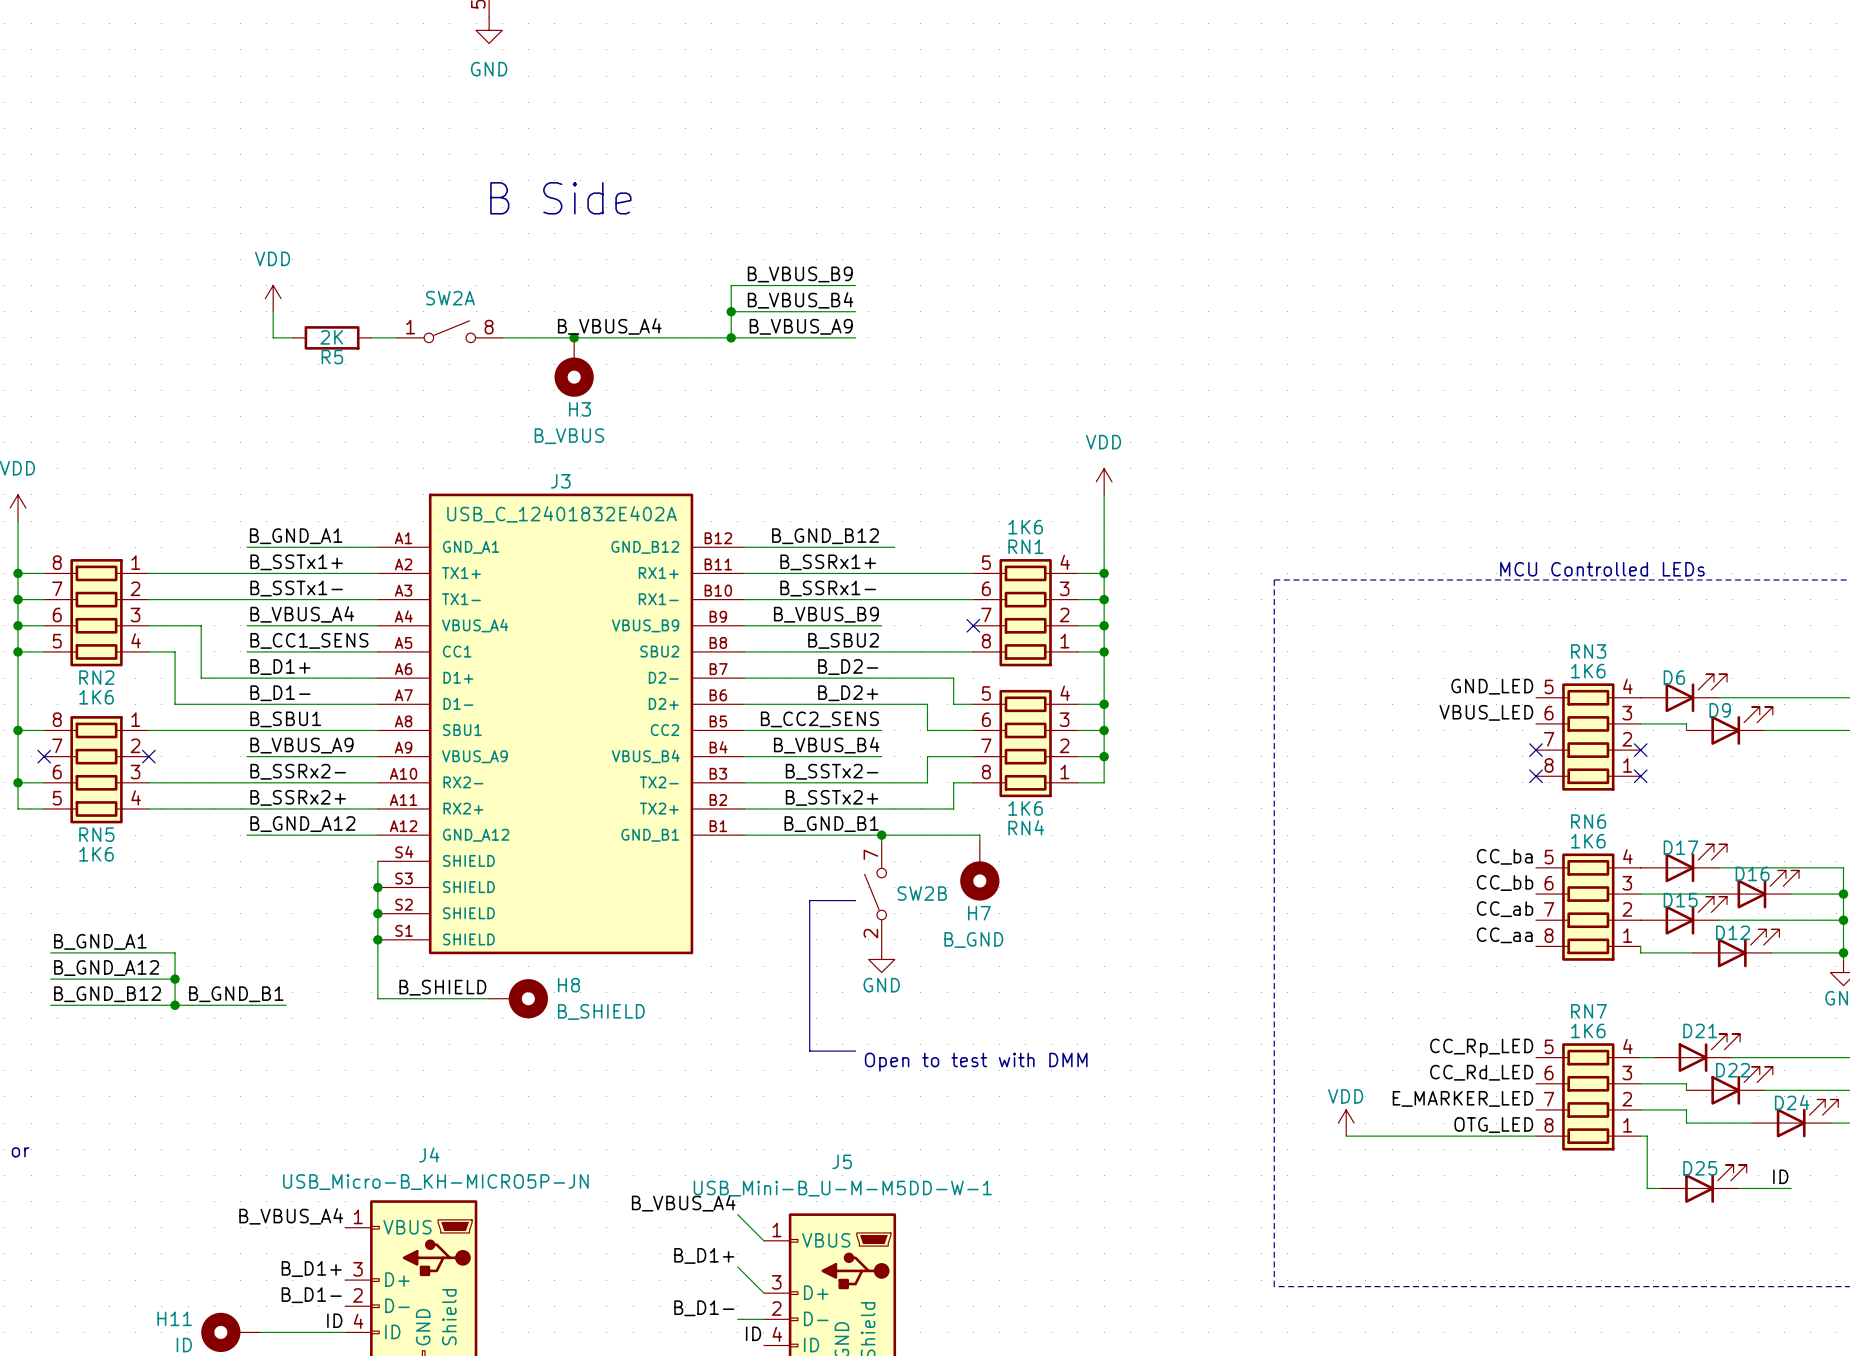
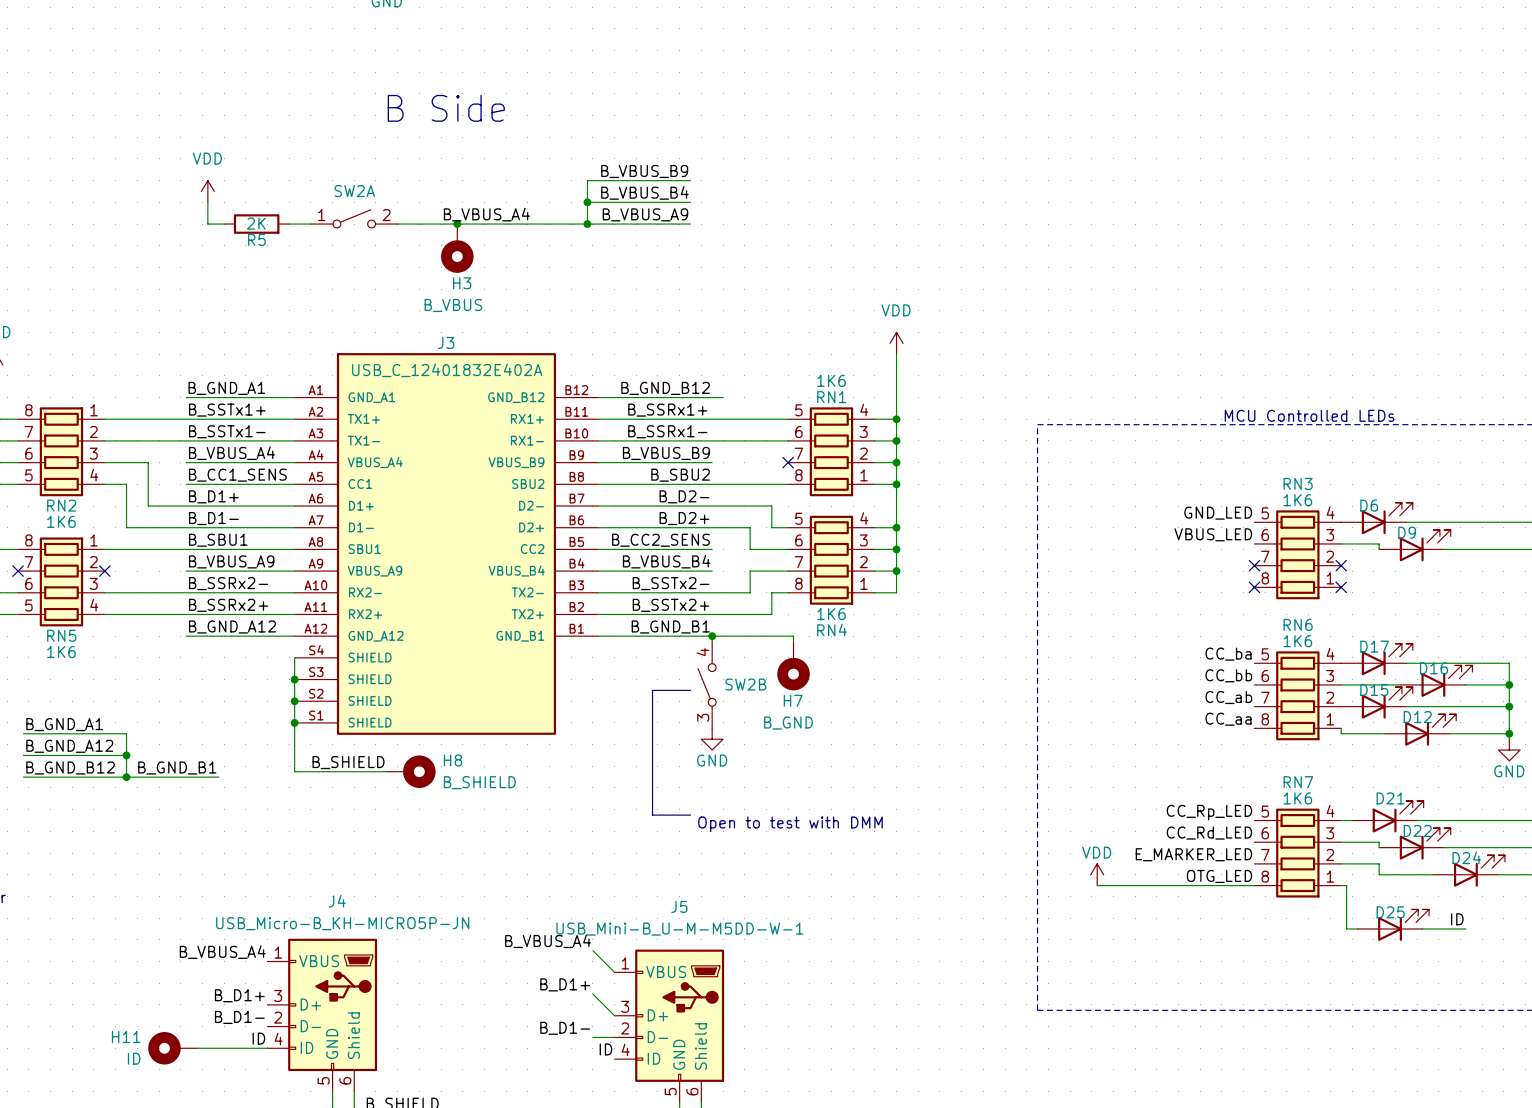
SW2A pin number: 8 (489, 327) -> 2 (386, 215)
SW2B pin number: 7 (870, 854) -> 4 (702, 652)
SW2B pin number: 2 (870, 933) -> 3 (703, 717)

